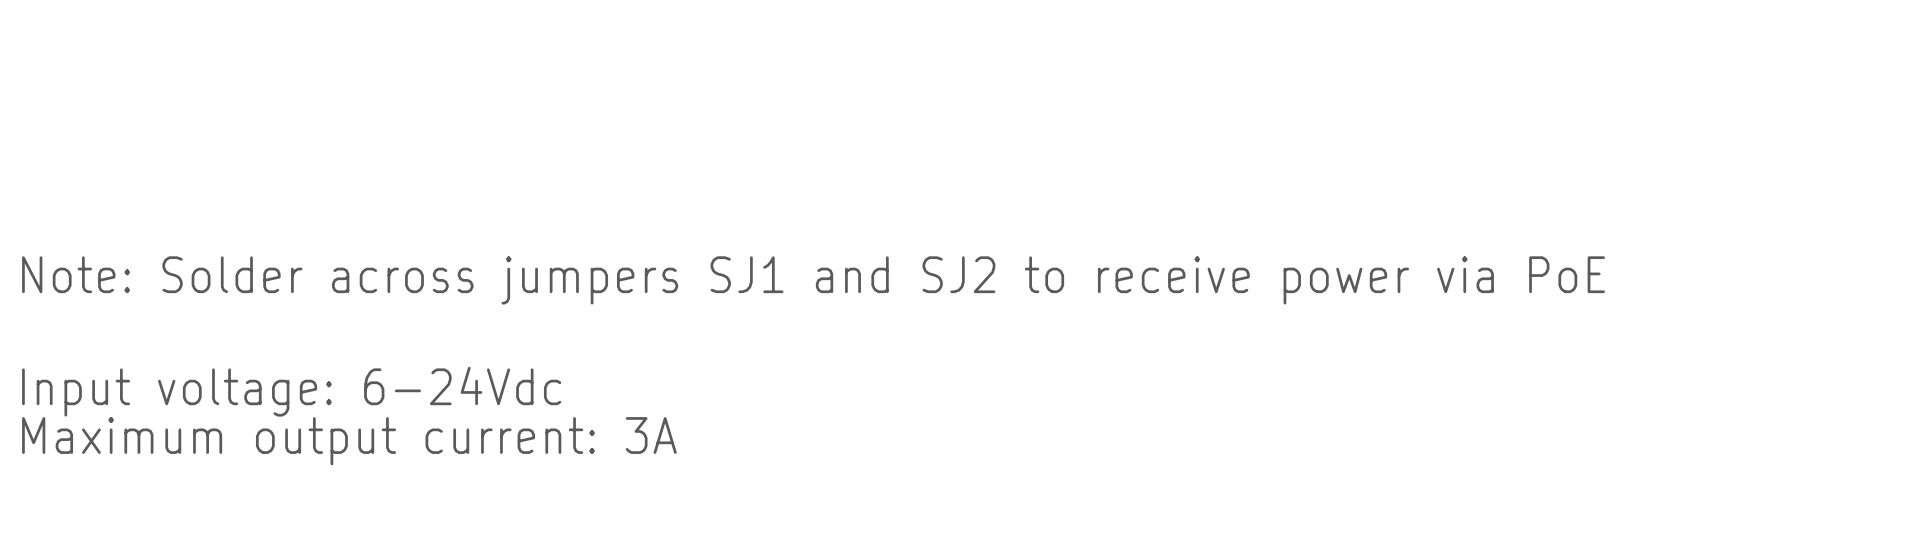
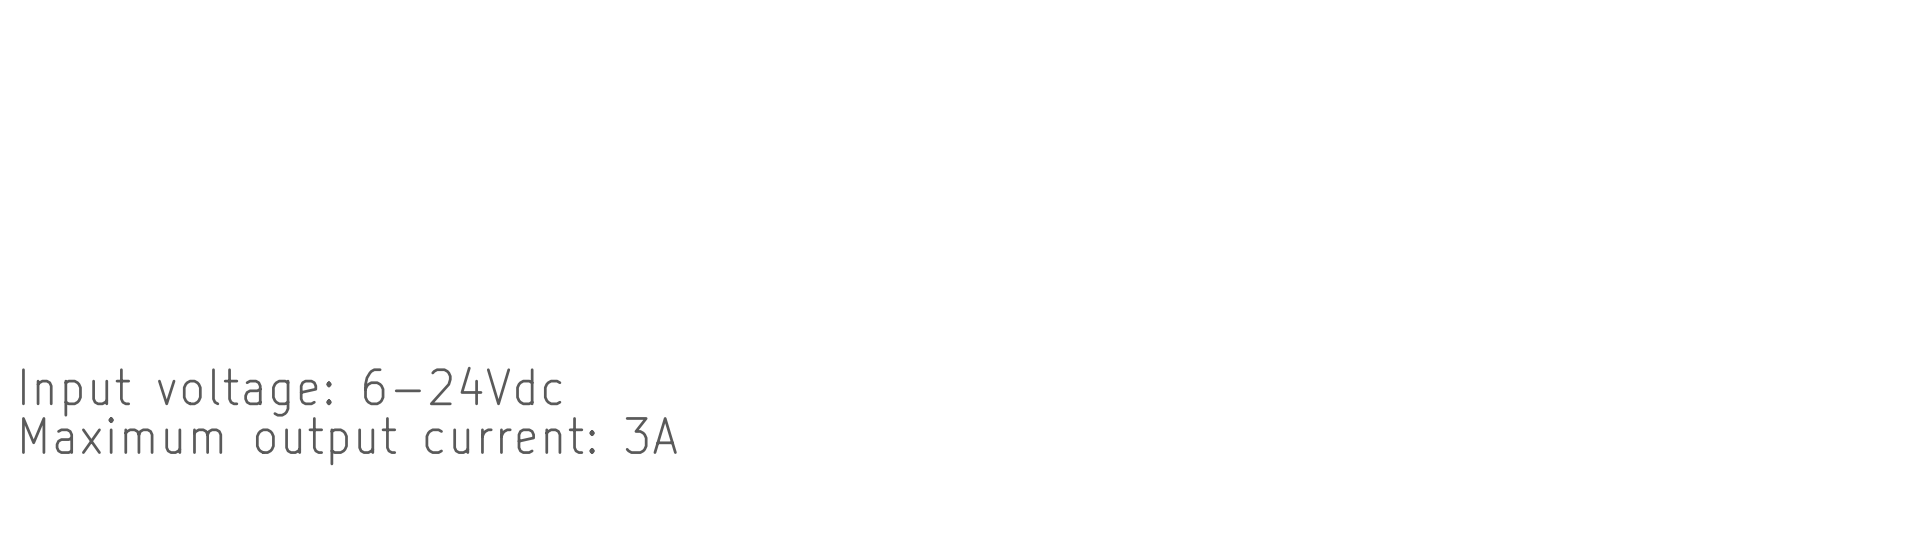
text: Note: Solder across jumpers SJ1 and SJ2 to receive power via PoE (813, 280) -> none

